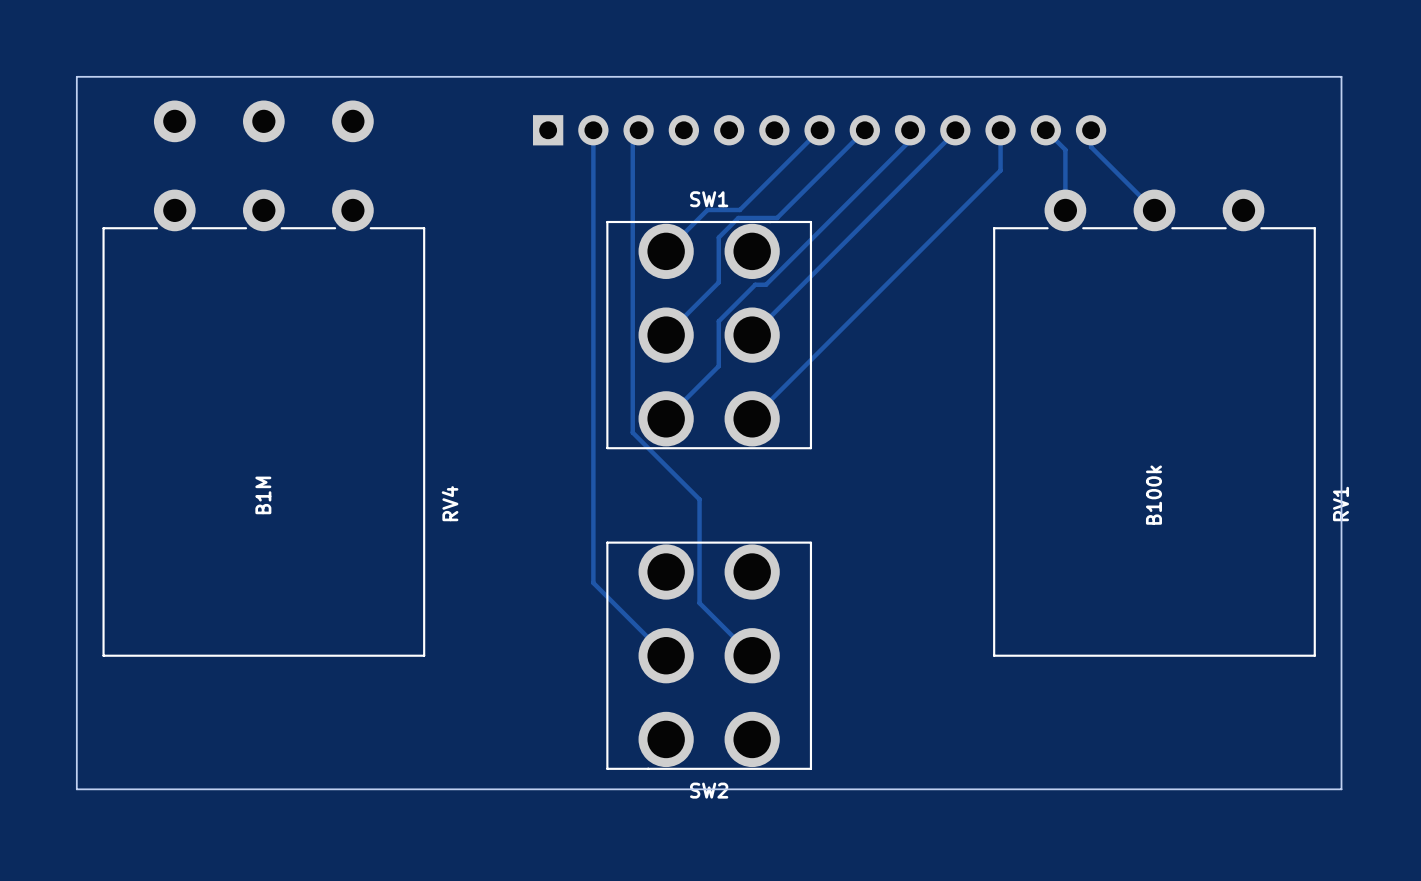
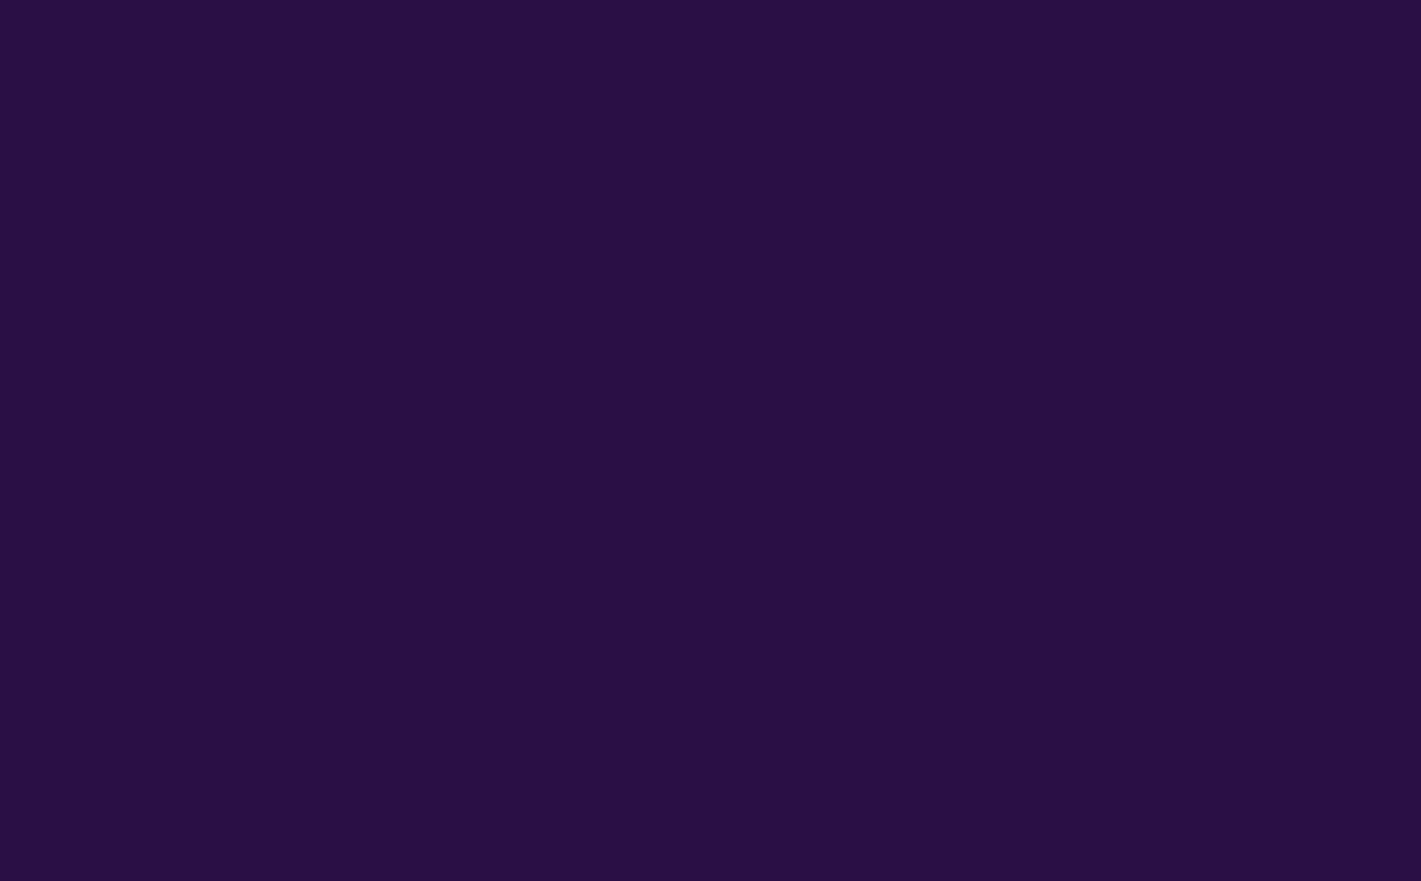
board edge: (76, 76) (1341, 76) (1341, 789) (76, 789) (76, 76) -> none
track: (593, 130) (593, 582) (666, 655) -> none
track: (819, 130) (739, 209) (707, 209) (666, 251) -> none
part: (819, 130) -> none
track: (864, 130) (777, 218) (738, 218) (718, 237) (718, 282) (666, 335) -> none
track: (1000, 130) (1000, 170) (752, 418) -> none
track: (1045, 130) (1065, 149) (1065, 210) -> none
track: (1091, 130) (1091, 147) (1154, 210) -> none
track: (955, 131) (752, 335) -> none
track: (632, 136) (632, 432) (699, 499) (699, 603) (752, 655) -> none
track: (910, 140) (766, 284) (755, 284) (718, 321) (718, 366) (666, 418) -> none
SW1: (709, 335) -> none
RV4: B1M (263, 378) -> none
RV1: B100k (1154, 423) -> none
SW2: (709, 655) -> none

